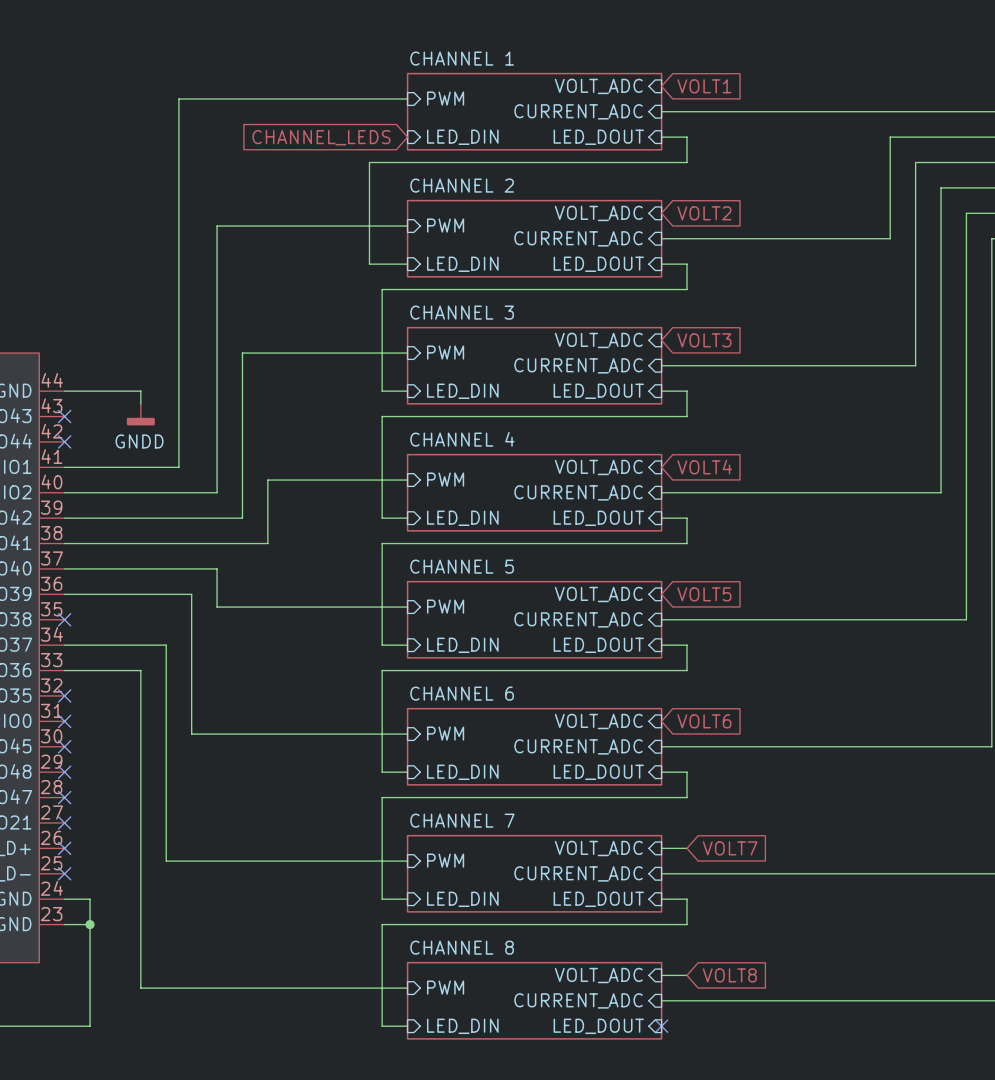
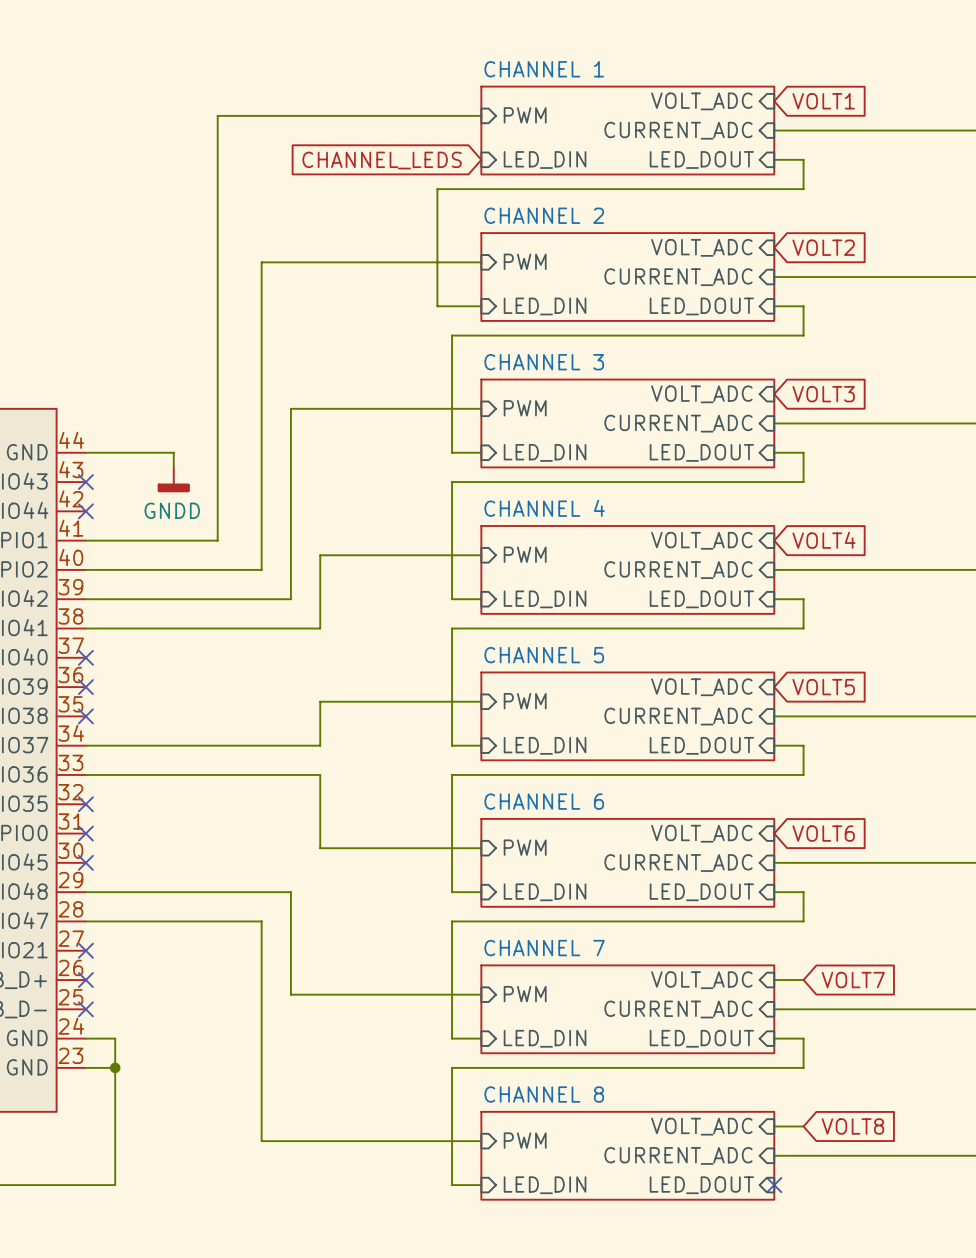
wire: (64, 568) (217, 568) (217, 607) (267, 607) -> (203, 745) (320, 745) (320, 701)
no-connect mark: none -> (85, 657)
wire: (64, 594) (191, 594) (191, 734) (267, 734) -> (173, 774) (320, 774) (320, 848)
no-connect mark: none -> (85, 687)
wire: (166, 645) (166, 861) (242, 861) -> (85, 892) (290, 892) (290, 994)
wire: (140, 670) (140, 988) (217, 988) -> (85, 921) (261, 921) (261, 1141)
no-connect mark: (64, 772) -> none
no-connect mark: (64, 797) -> none

